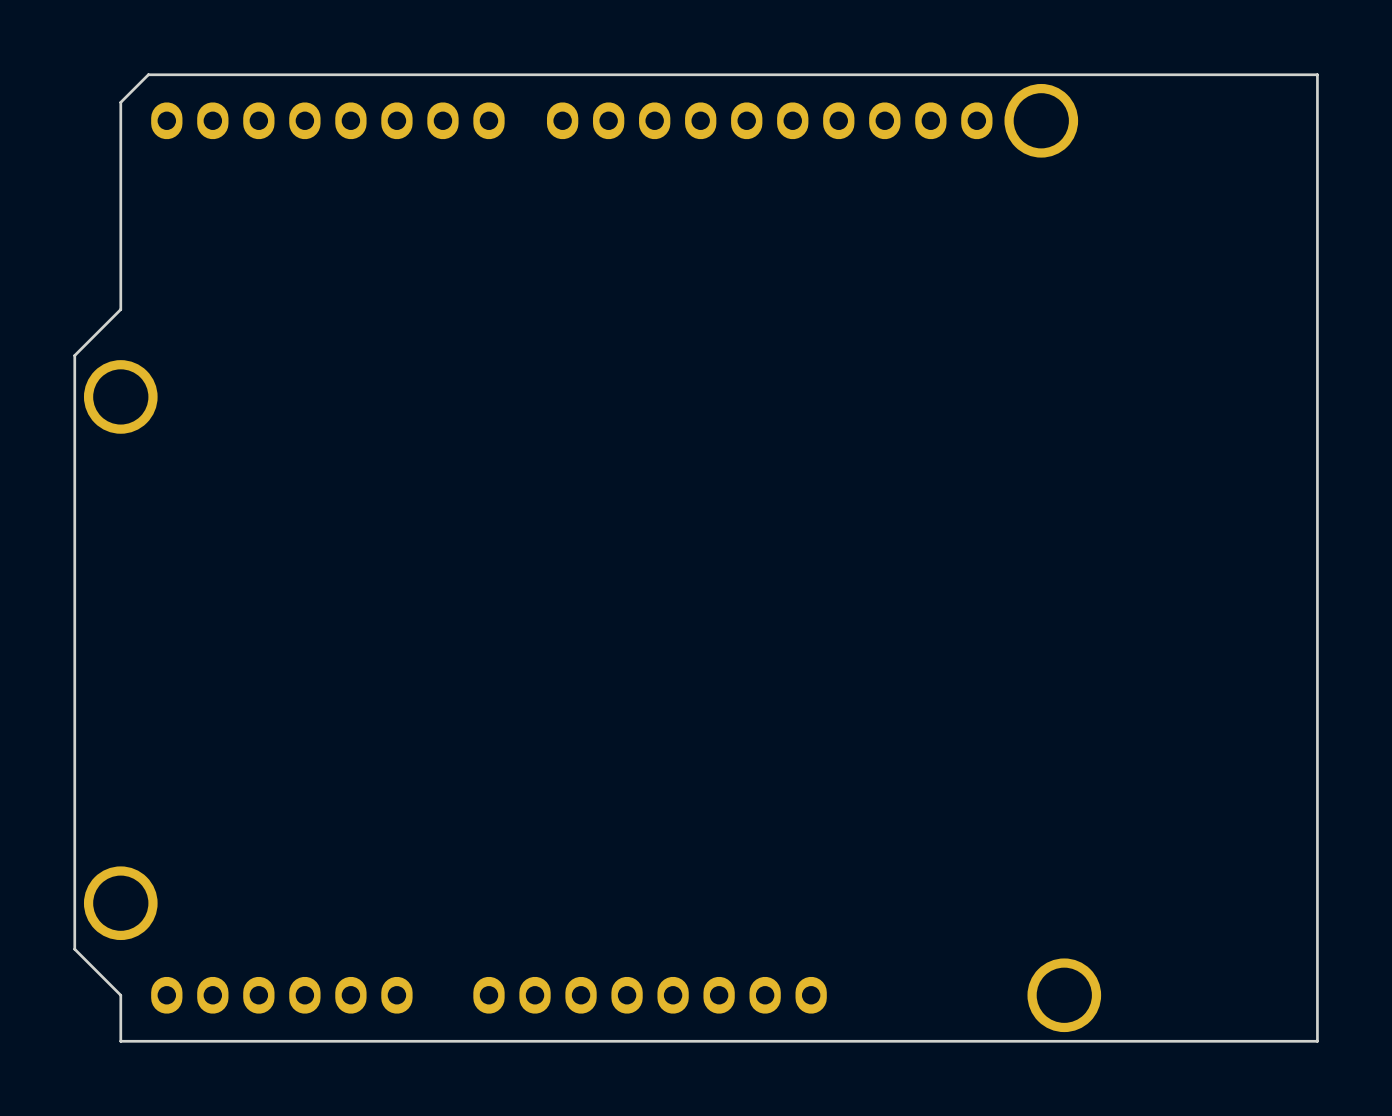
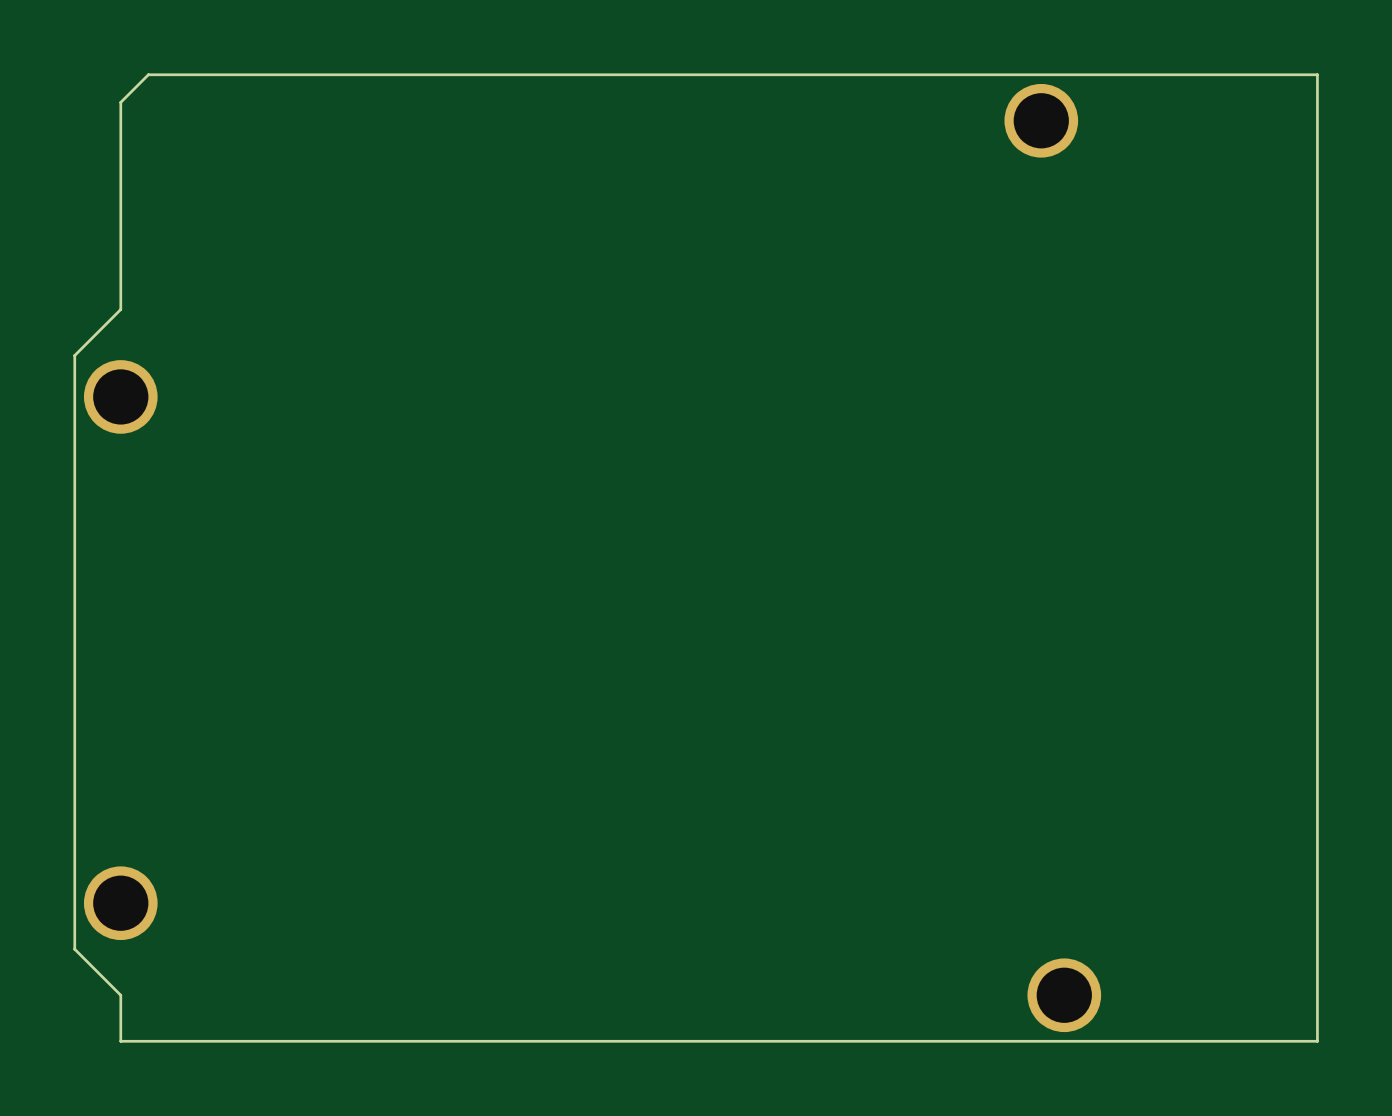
part: (327, 120) -> none
part: (769, 120) -> none
part: (281, 995) -> none
part: (650, 995) -> none

